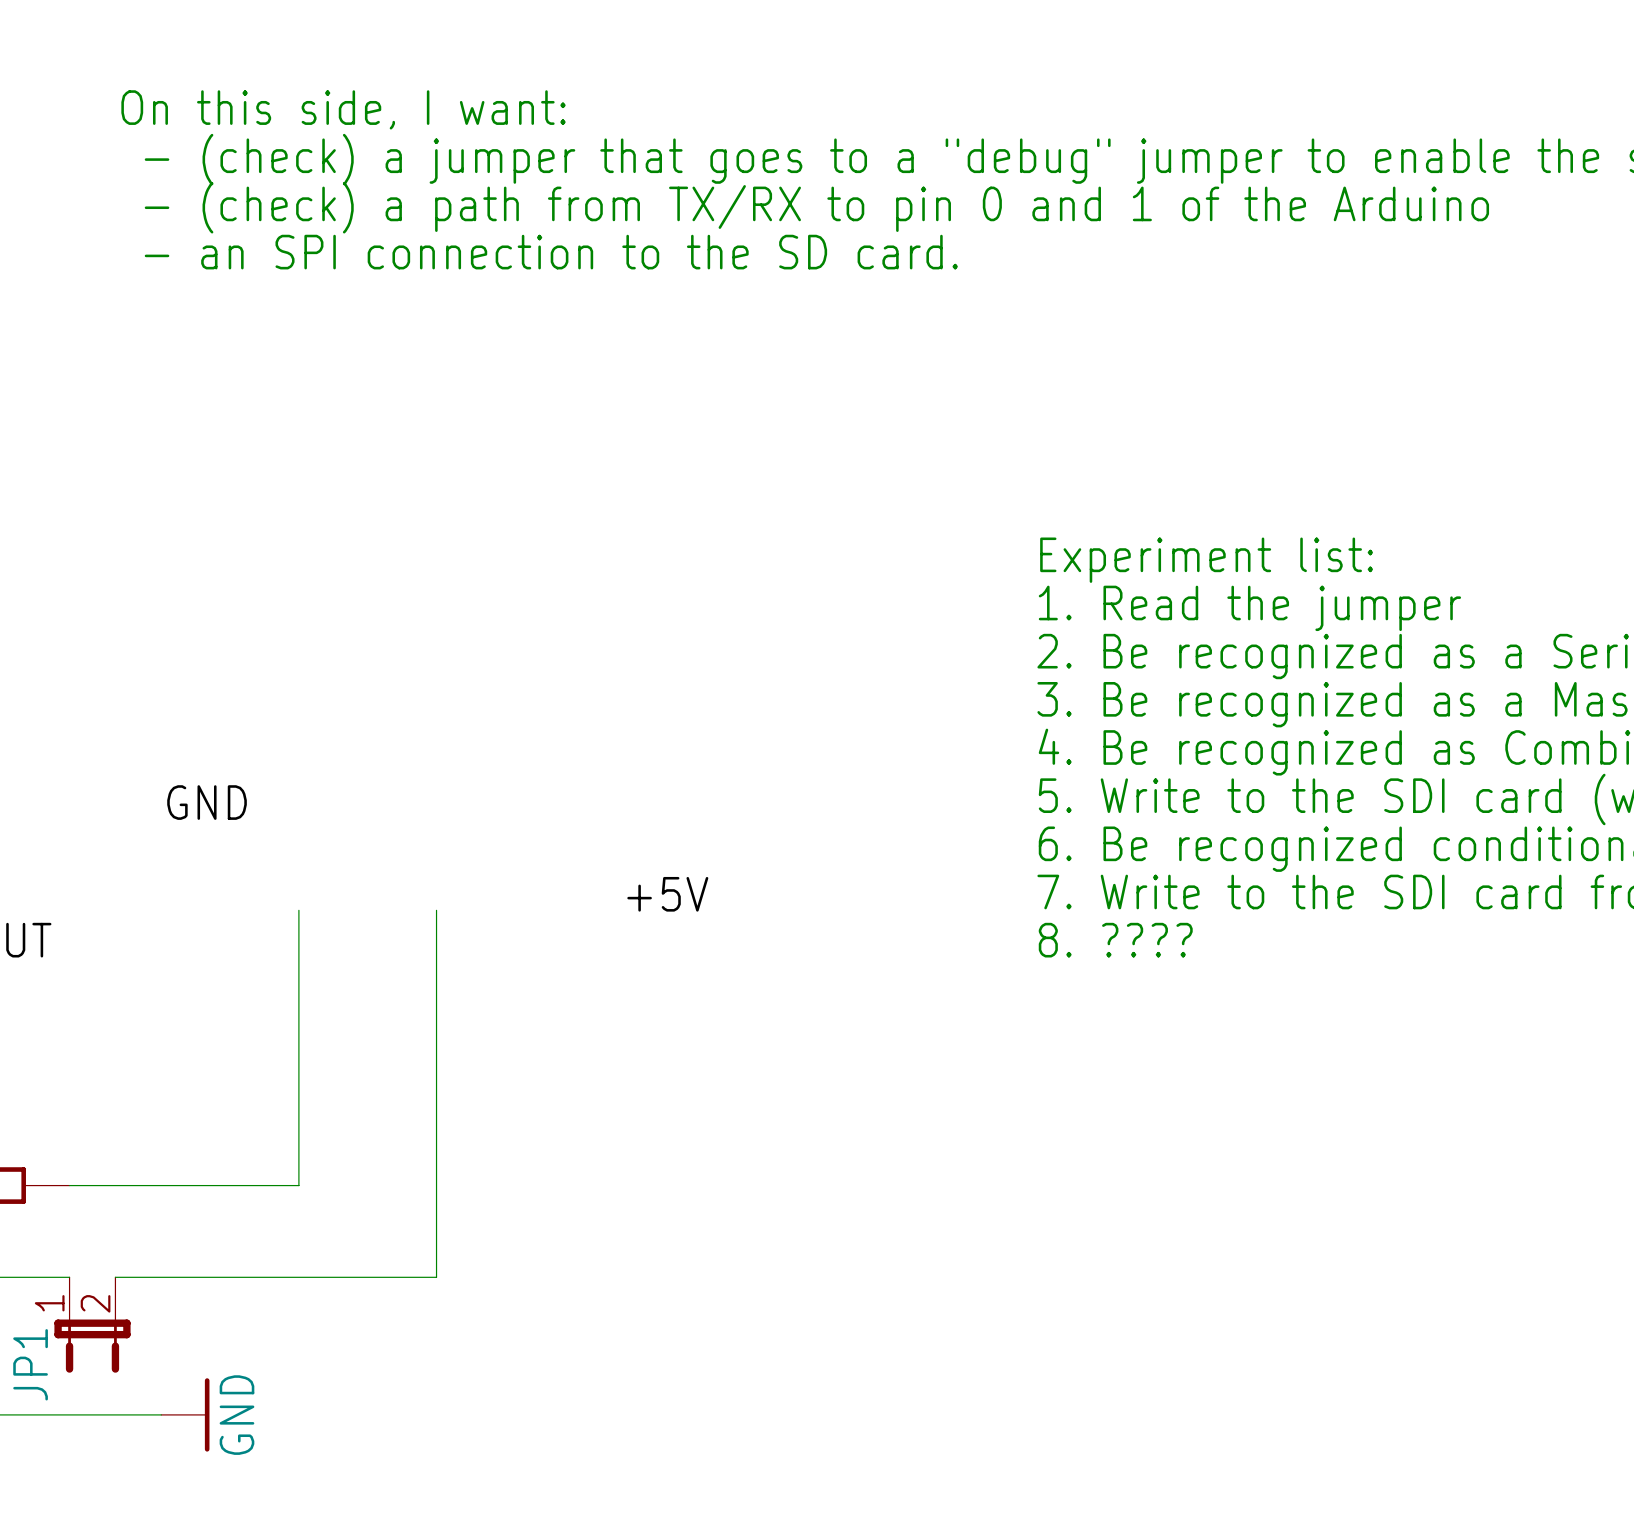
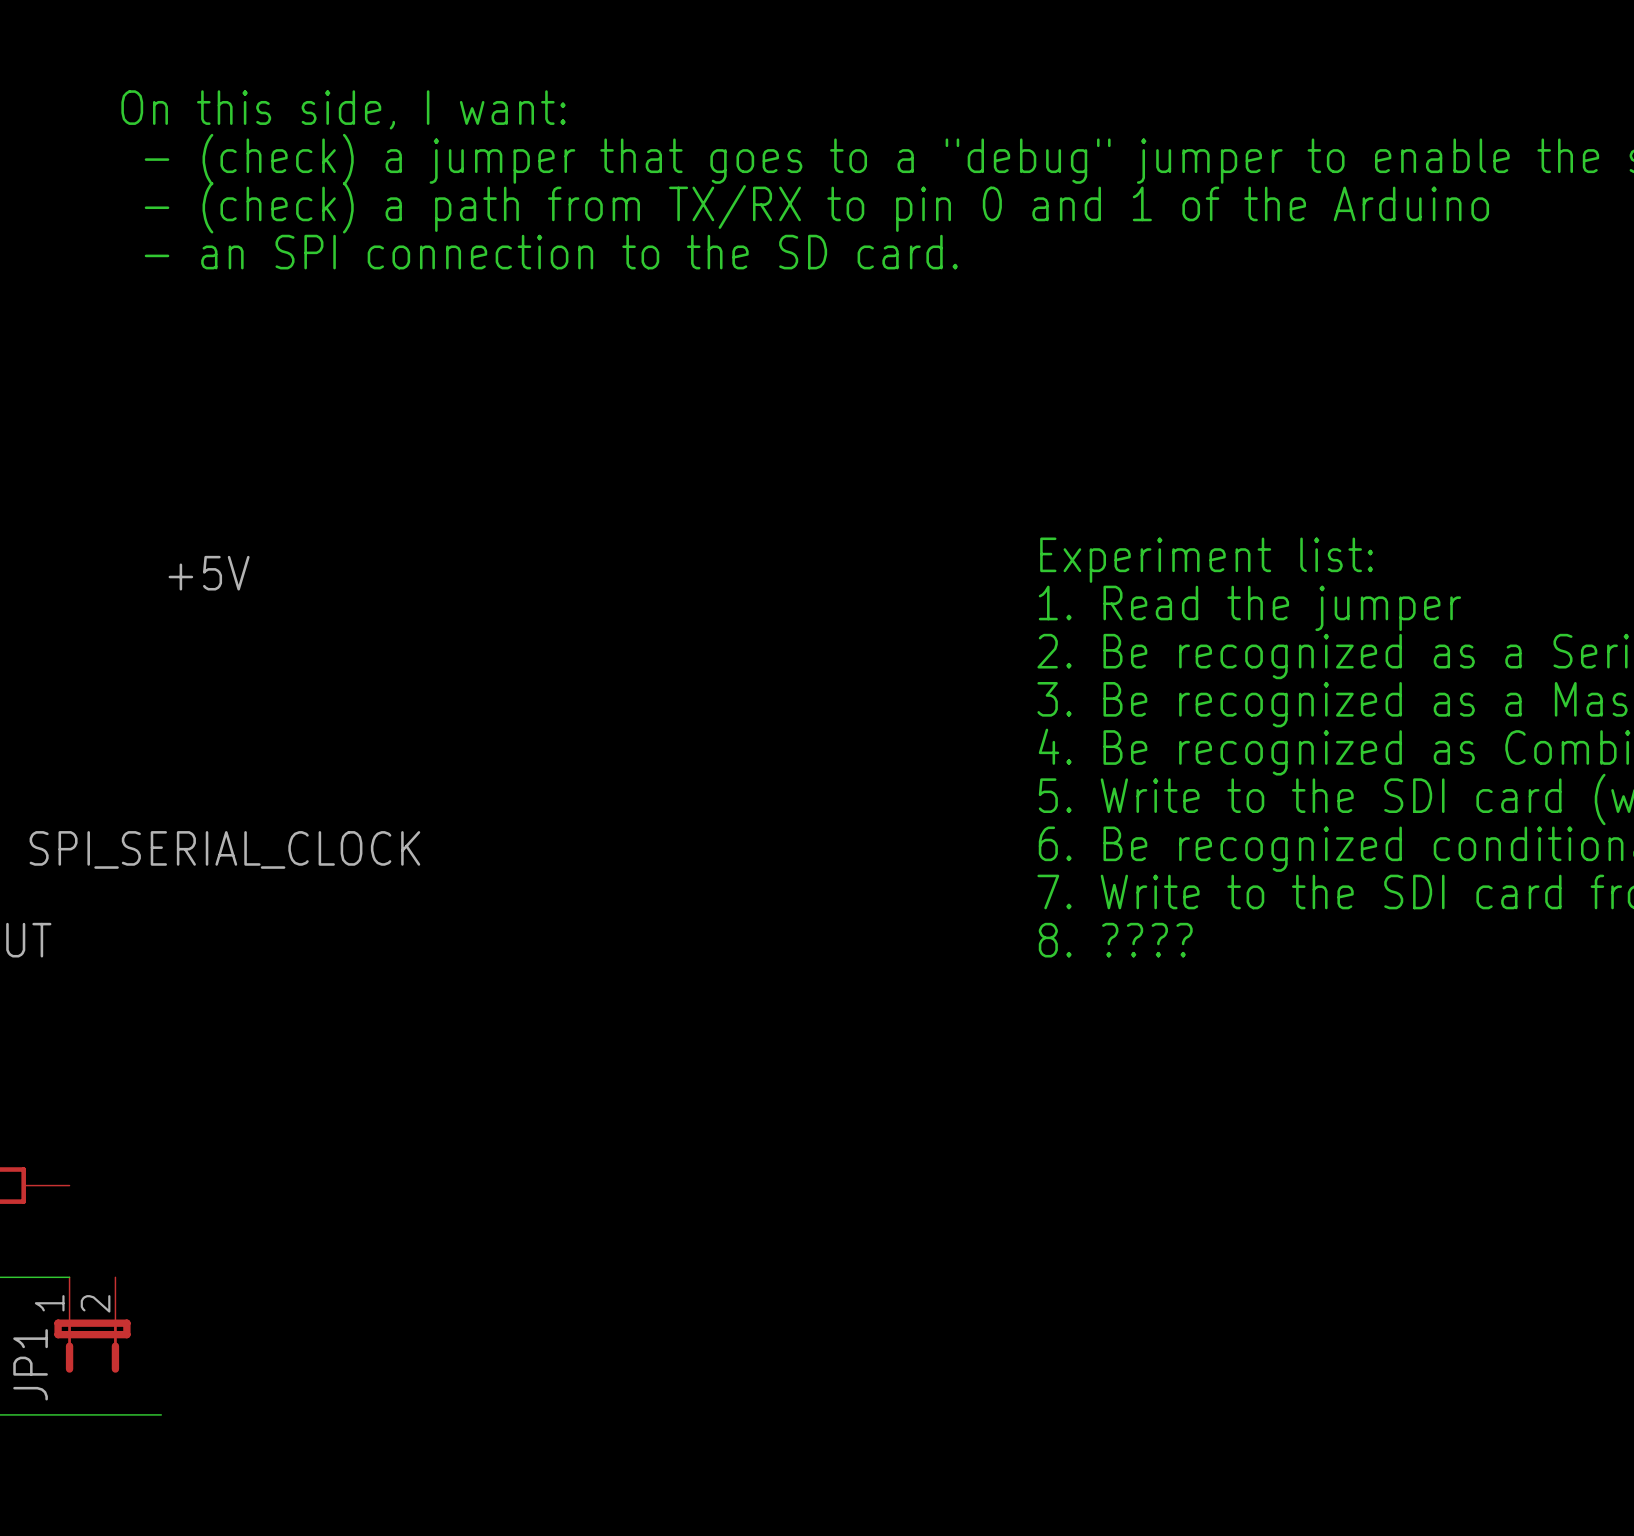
label: none -> +5V (209, 573)
label: GND (207, 802) -> none
label: none -> SPI_SERIAL_CLOCK (224, 849)
label: +5V (667, 894) -> none
wire: (298, 910) (298, 1185) (69, 1185) -> none
wire: (436, 910) (436, 1277) (115, 1277) -> none
power symbol: GND (185, 1414) -> none

